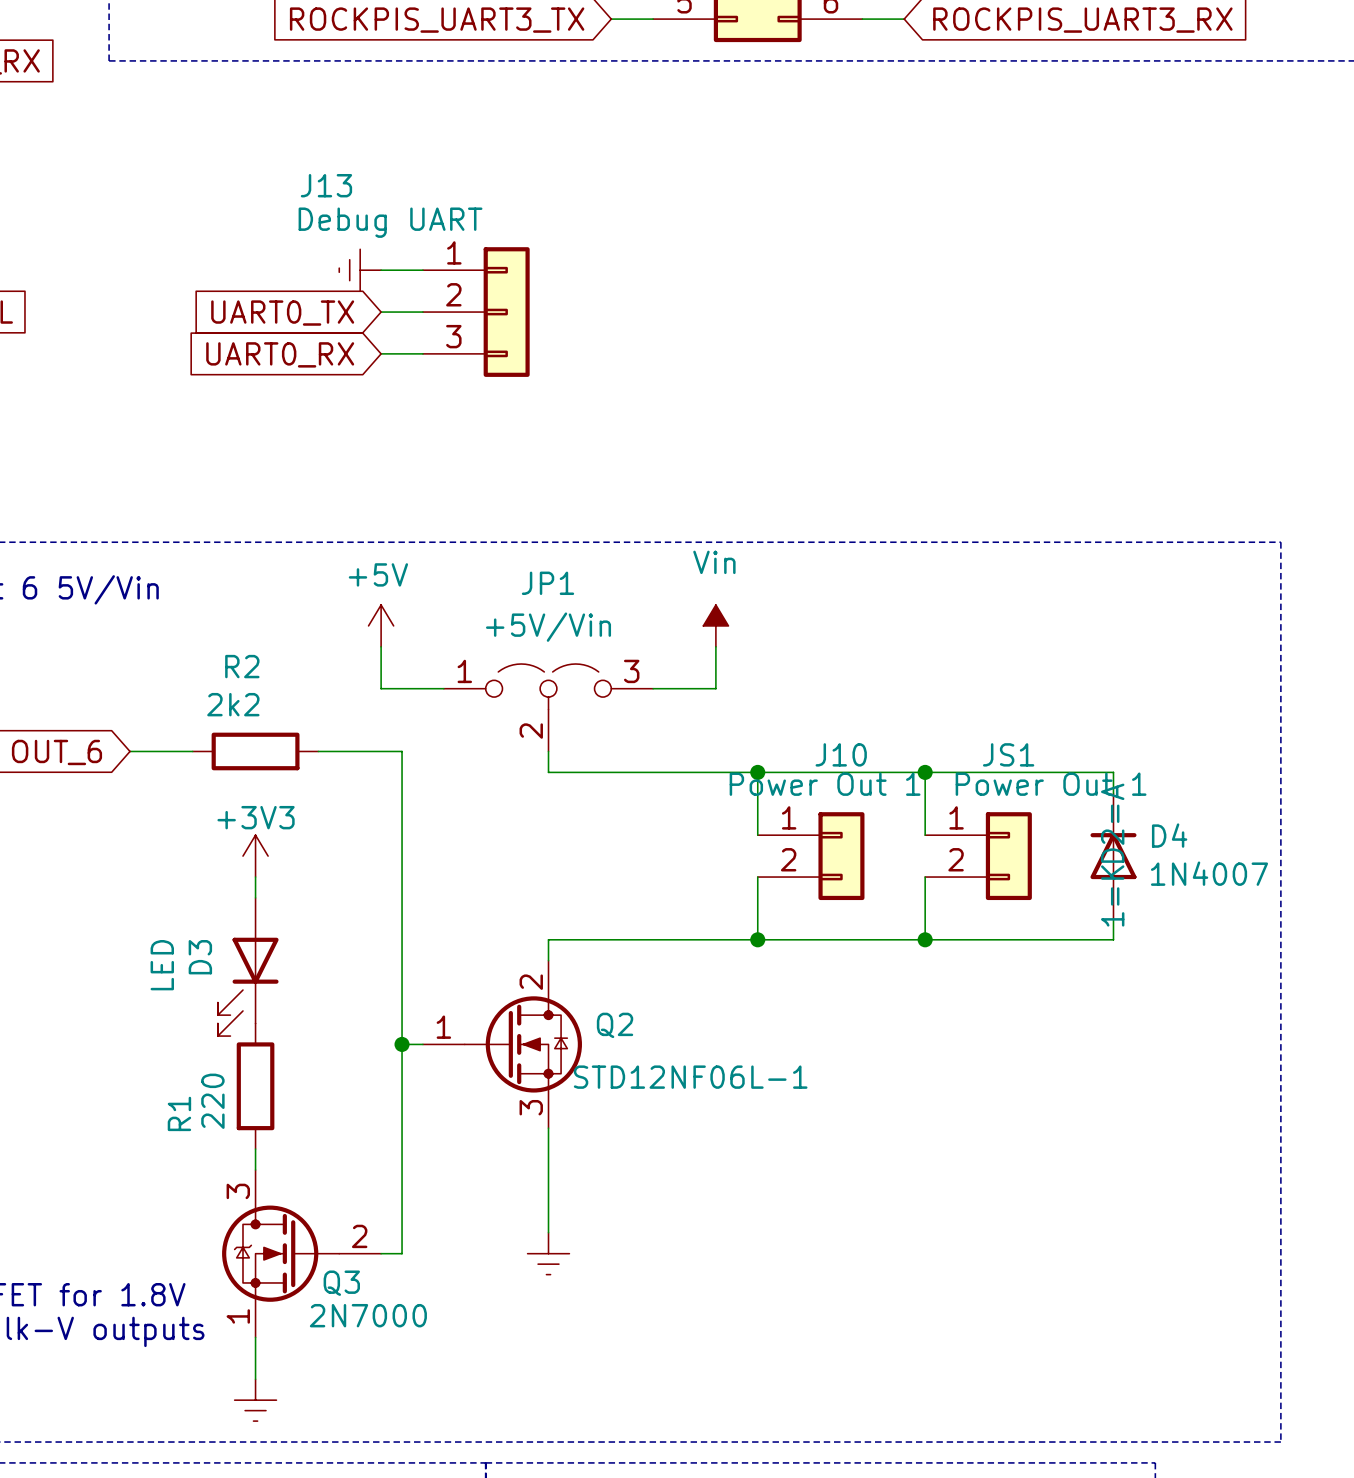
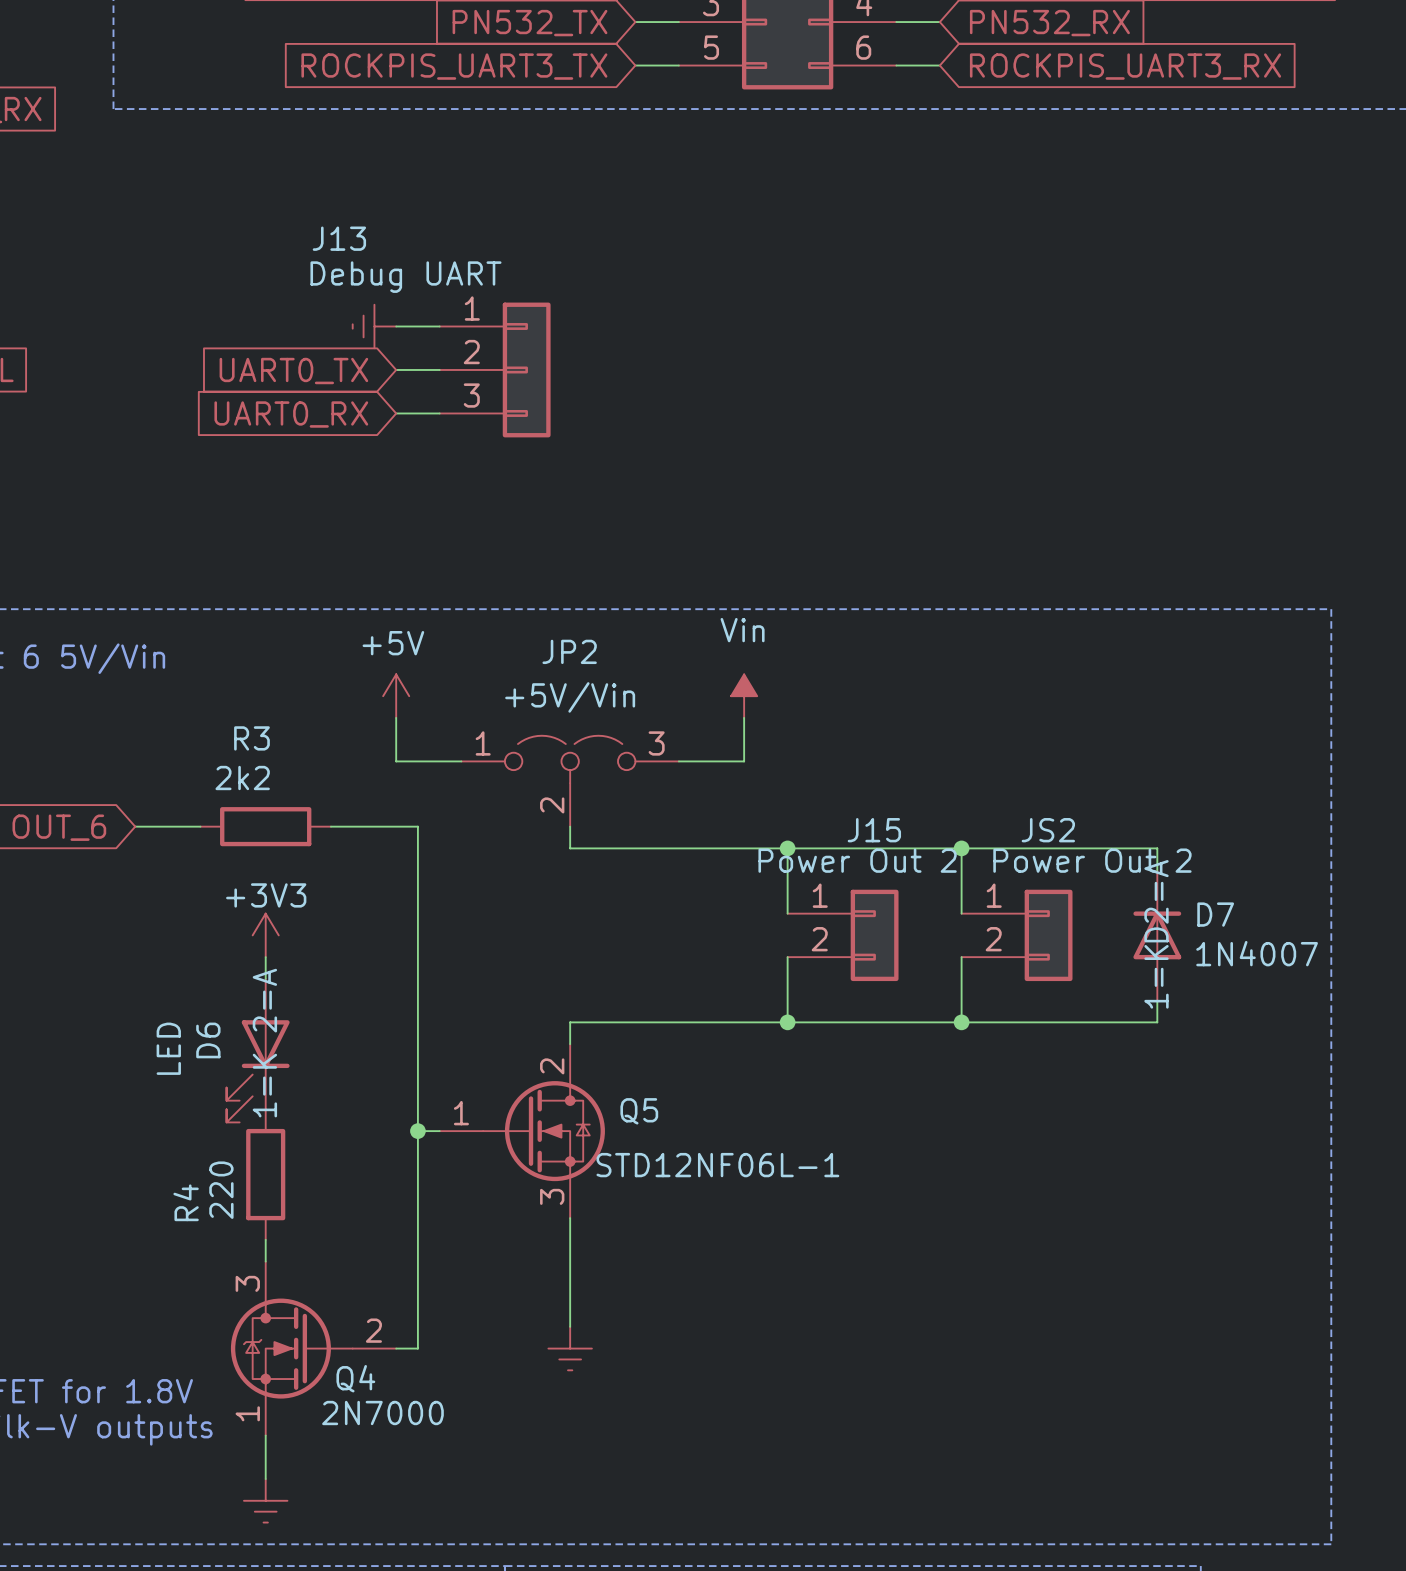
JP1 name: JP1 (548, 583) -> JP2 (569, 651)
R2 name: R2 (242, 666) -> R3 (251, 738)
J10 name: J10 (841, 754) -> J15 (874, 830)
JS1 name: JS1 (1008, 754) -> JS2 (1048, 830)
J10 value: Power Out 1 (825, 784) -> Power Out 2 (857, 860)
JS1 value: Power Out 1 (1051, 784) -> Power Out 2 (1092, 860)
D4 name: D4 (1169, 835) -> D7 (1215, 914)
D3 name: D3 (200, 957) -> D6 (208, 1040)
D3 text: none -> 1=K 2=A (264, 1043)
Q2 name: Q2 (615, 1025) -> Q5 (639, 1111)
R1 name: R1 (179, 1113) -> R4 (186, 1202)
Q3 name: Q3 (341, 1283) -> Q4 (355, 1378)

